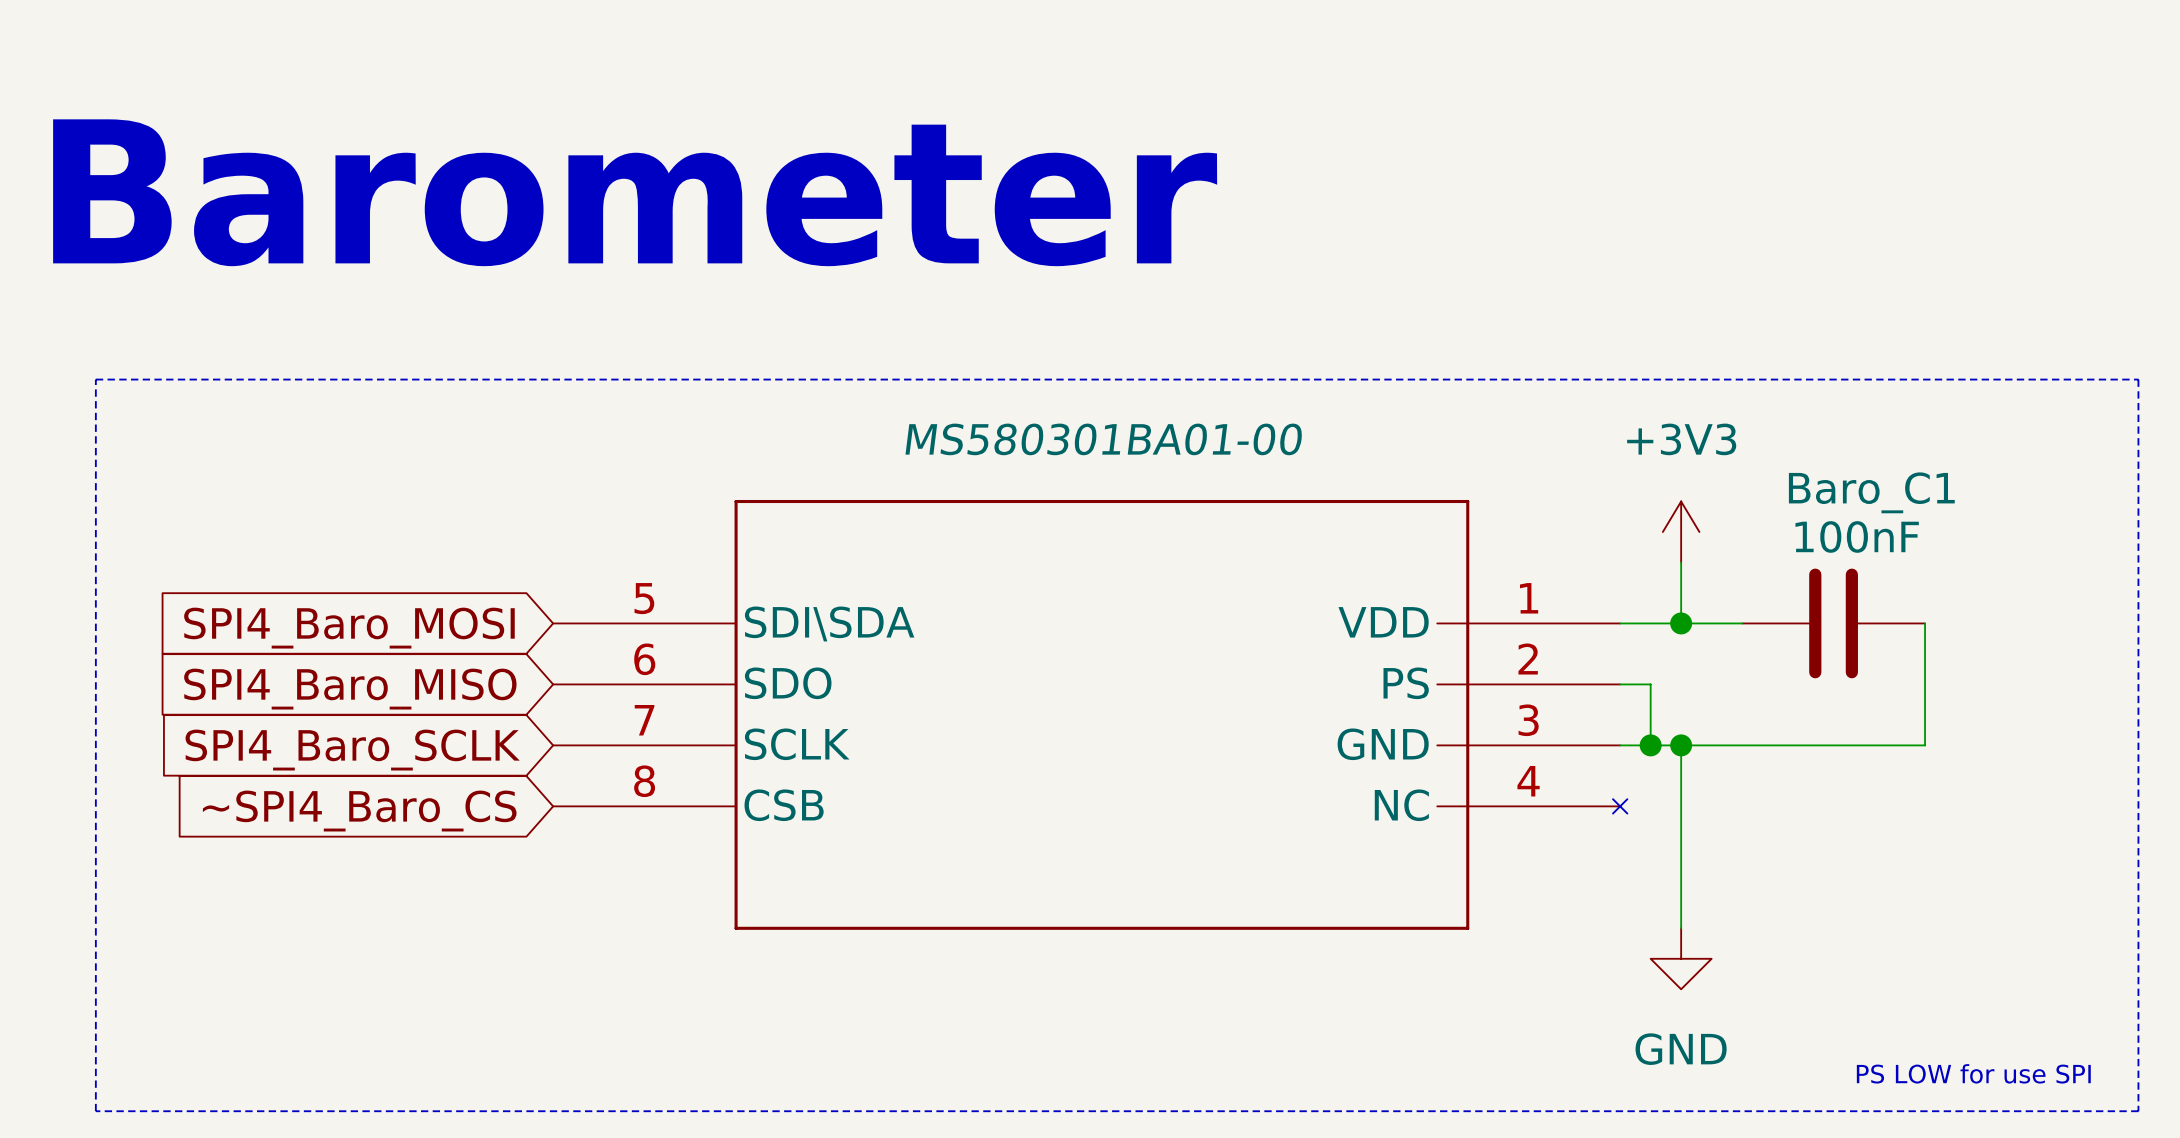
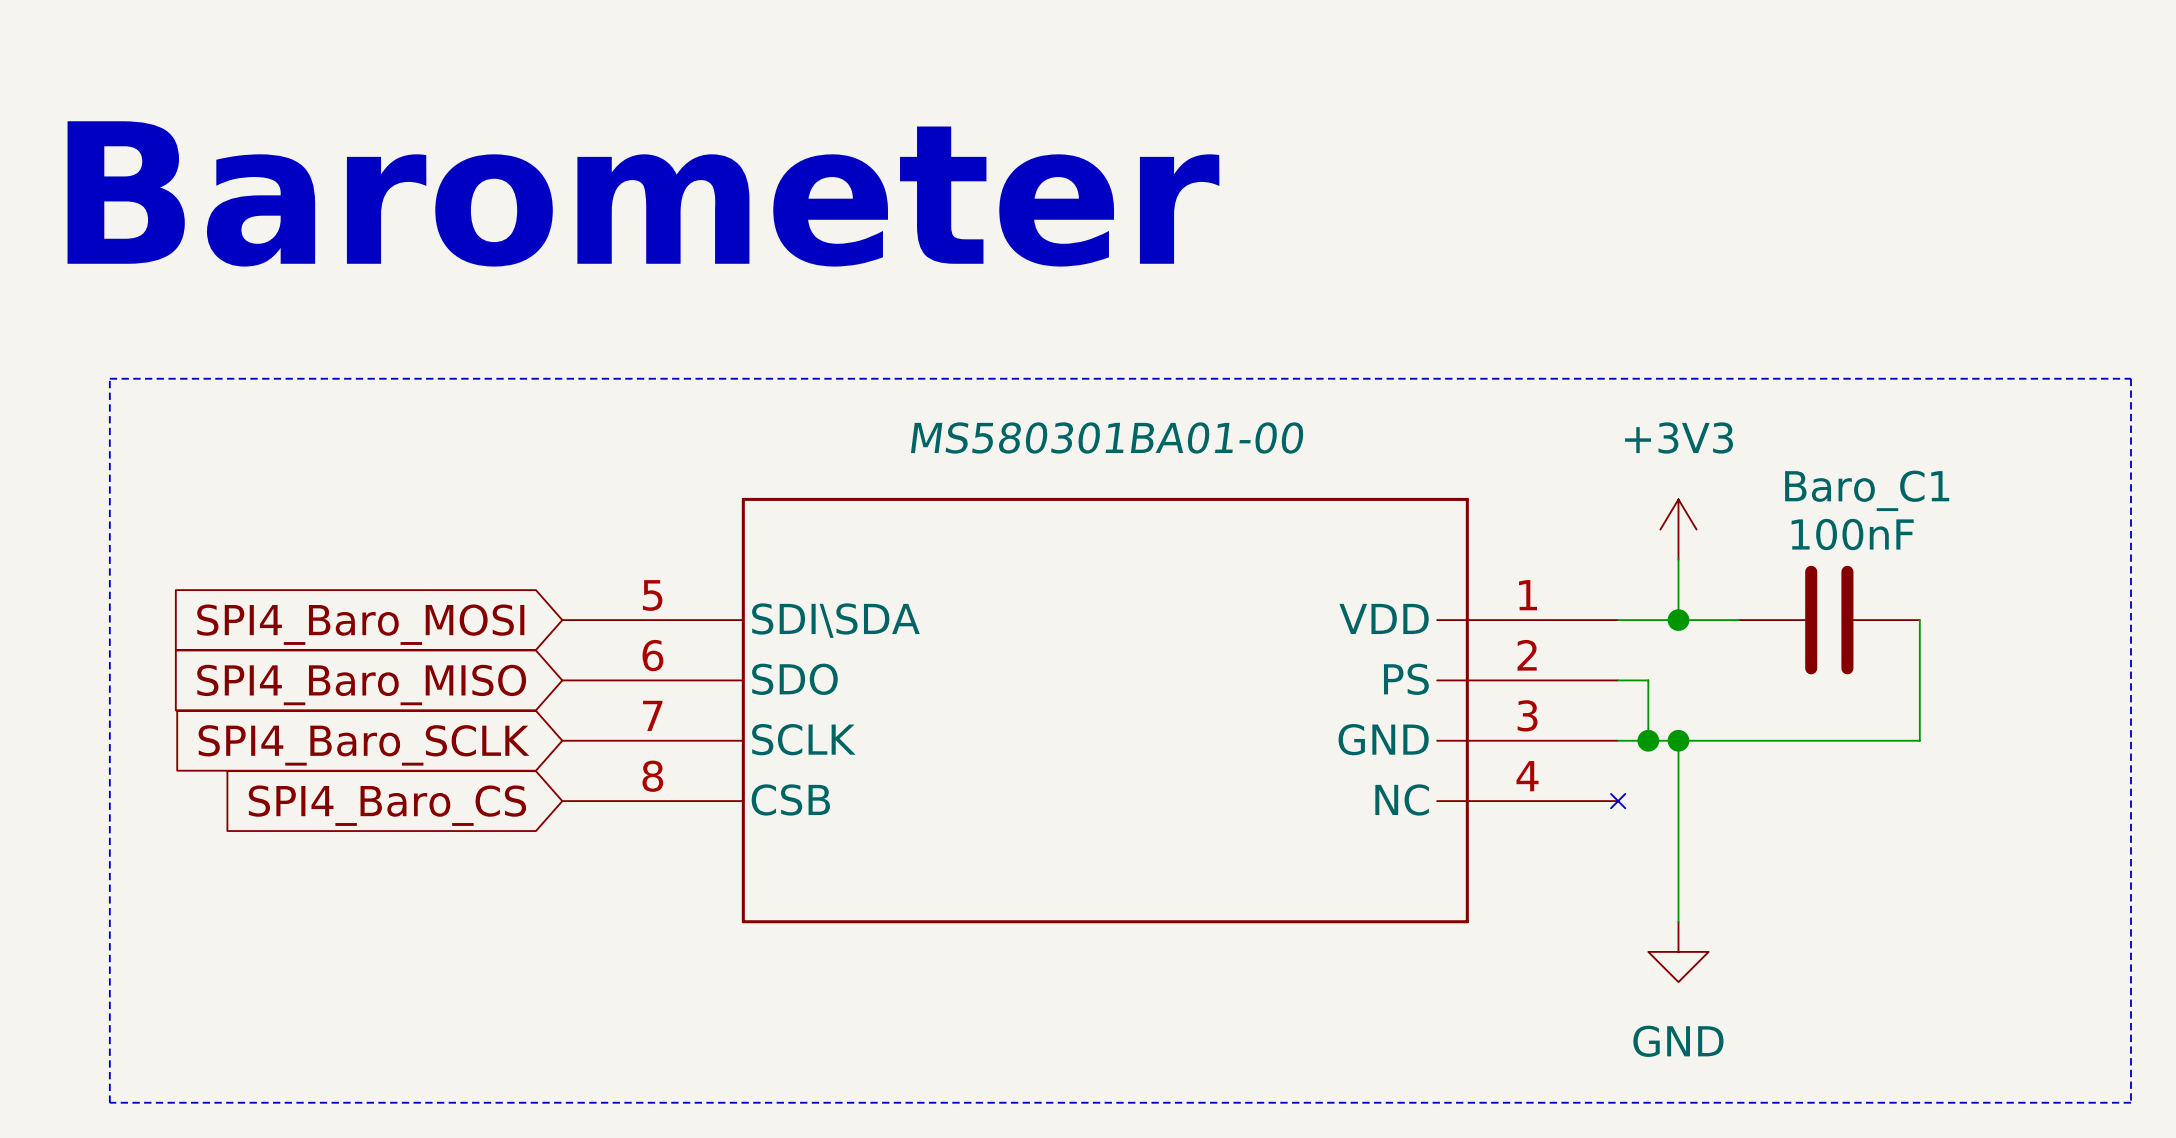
global label: ~SPI4_Baro_CS (359, 811) -> SPI4_Baro_CS (387, 805)
text: PS LOW for use SPI (1973, 1073) -> none

